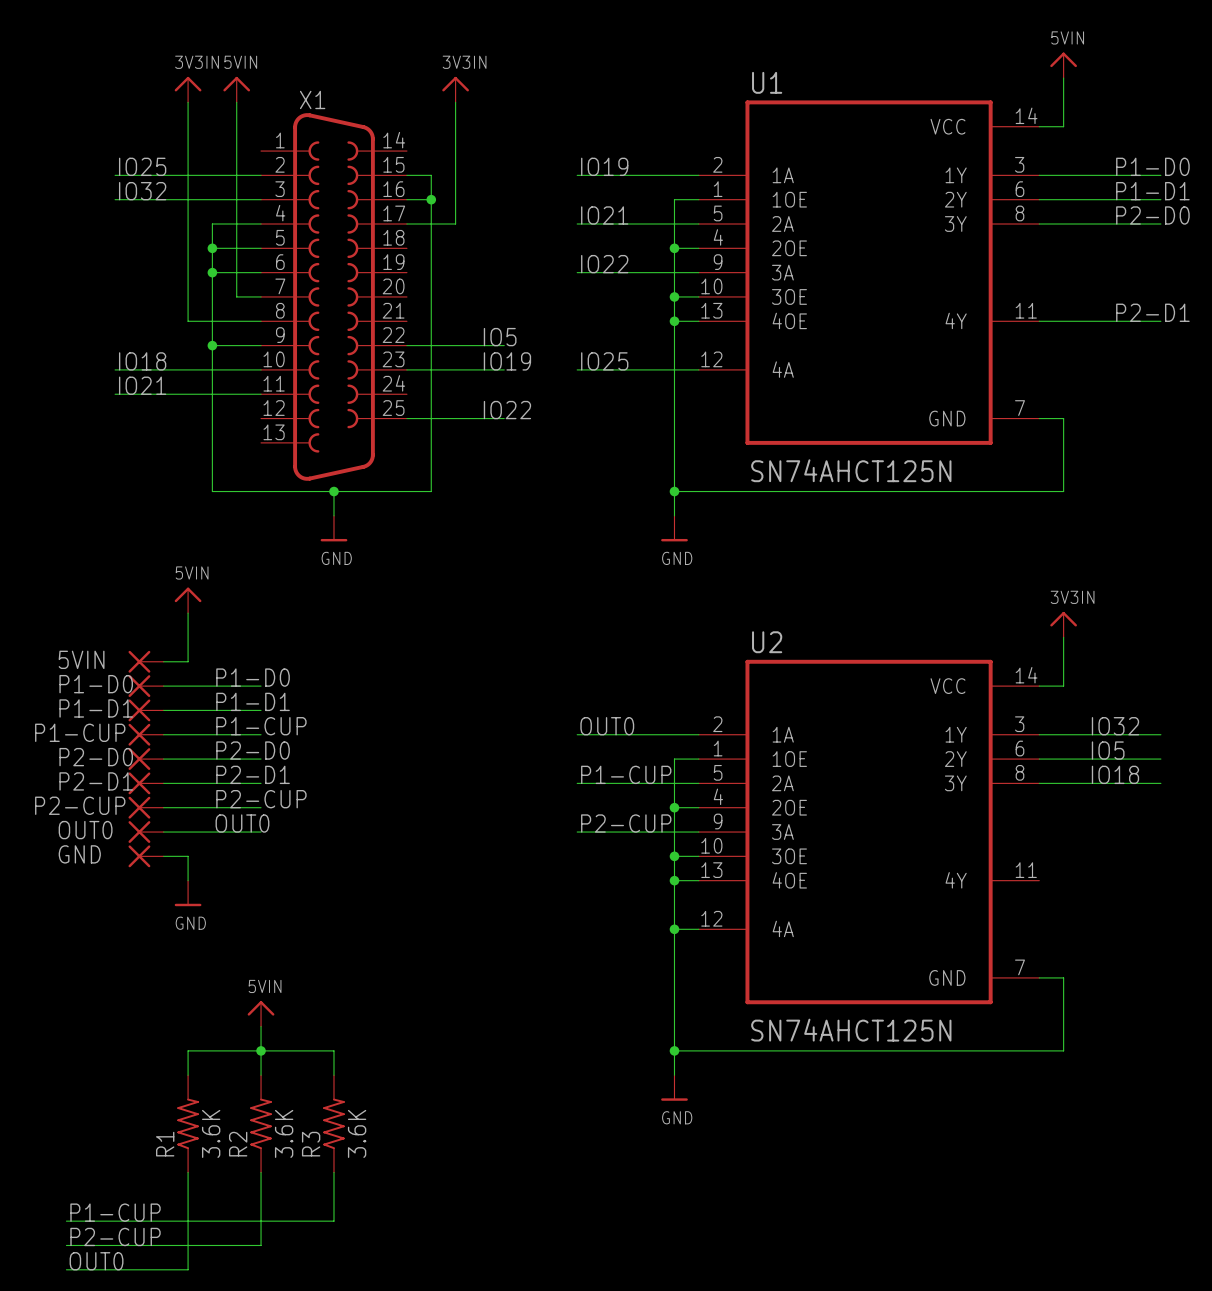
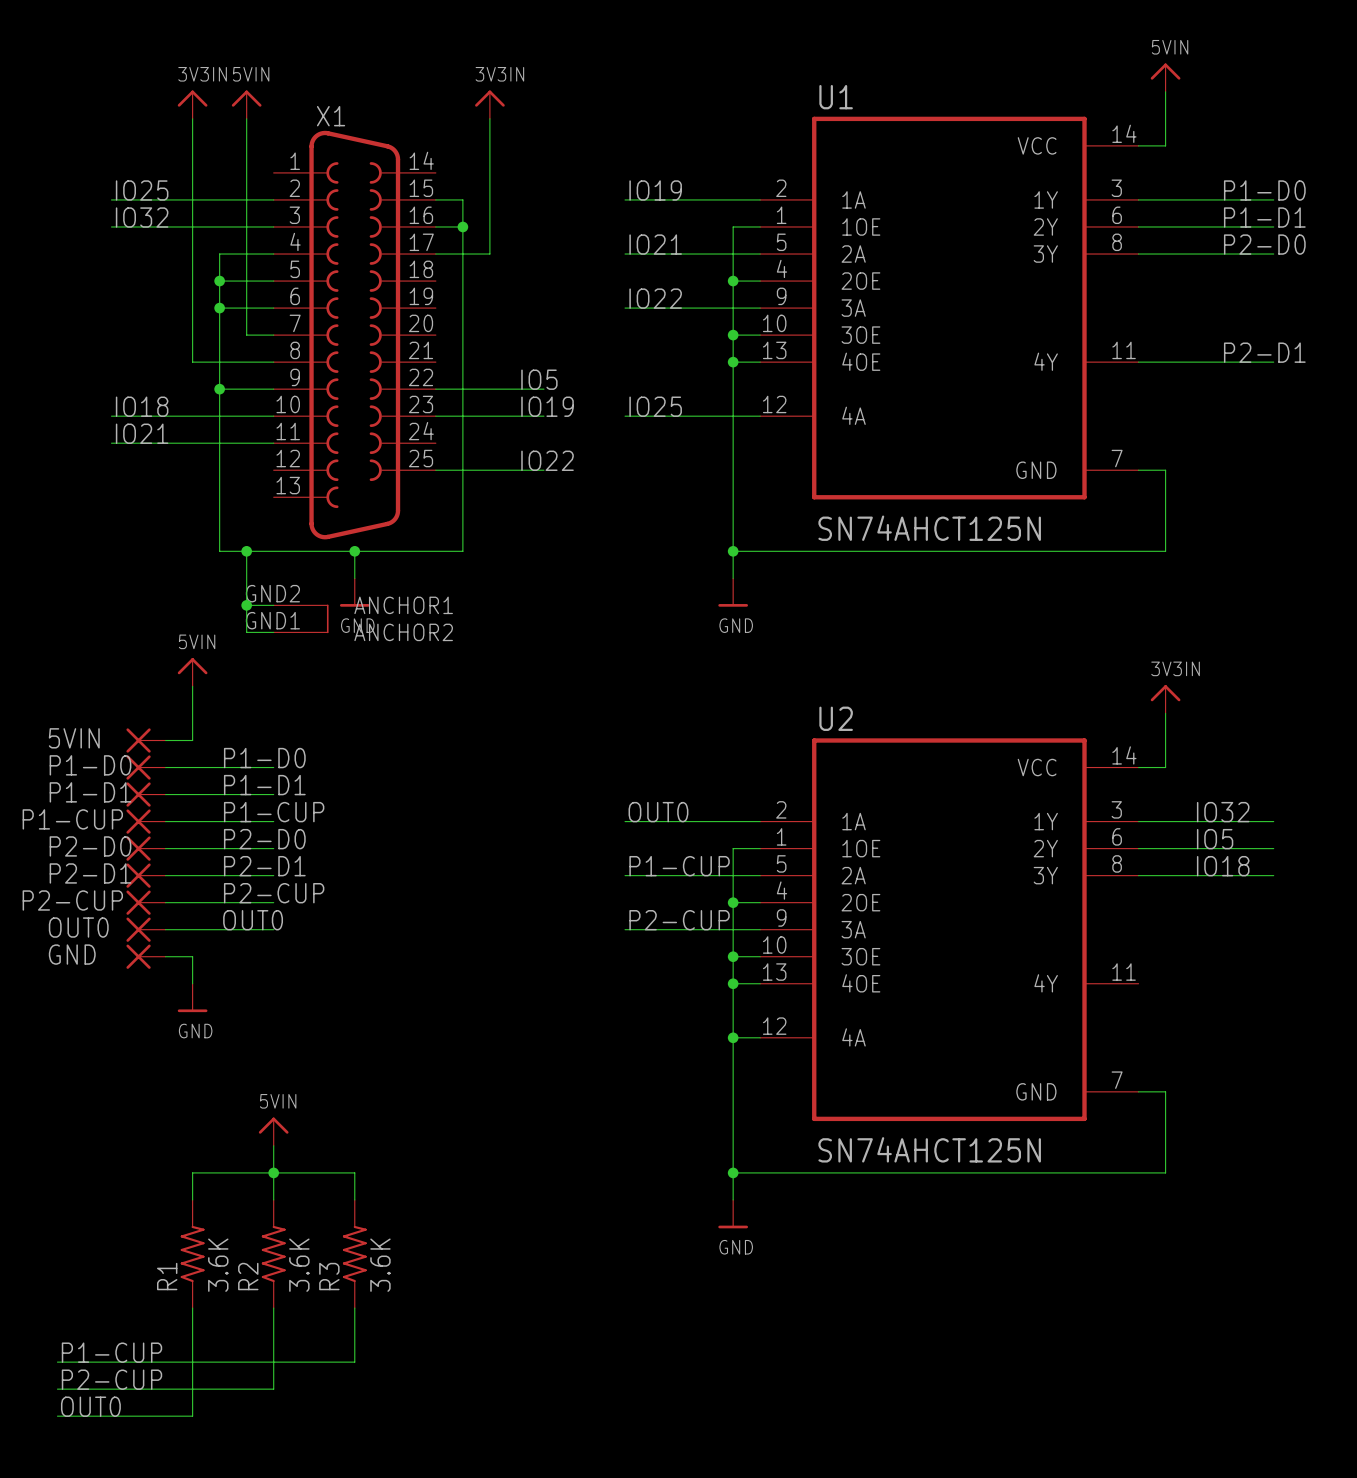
X1 symbol: [261, 113, 407, 481] -> [273, 130, 436, 634]
wire: none -> (246, 551) (246, 632) (273, 632)
junction: none -> (246, 551)
wire: none -> (246, 605) (273, 605)
junction: none -> (246, 605)

